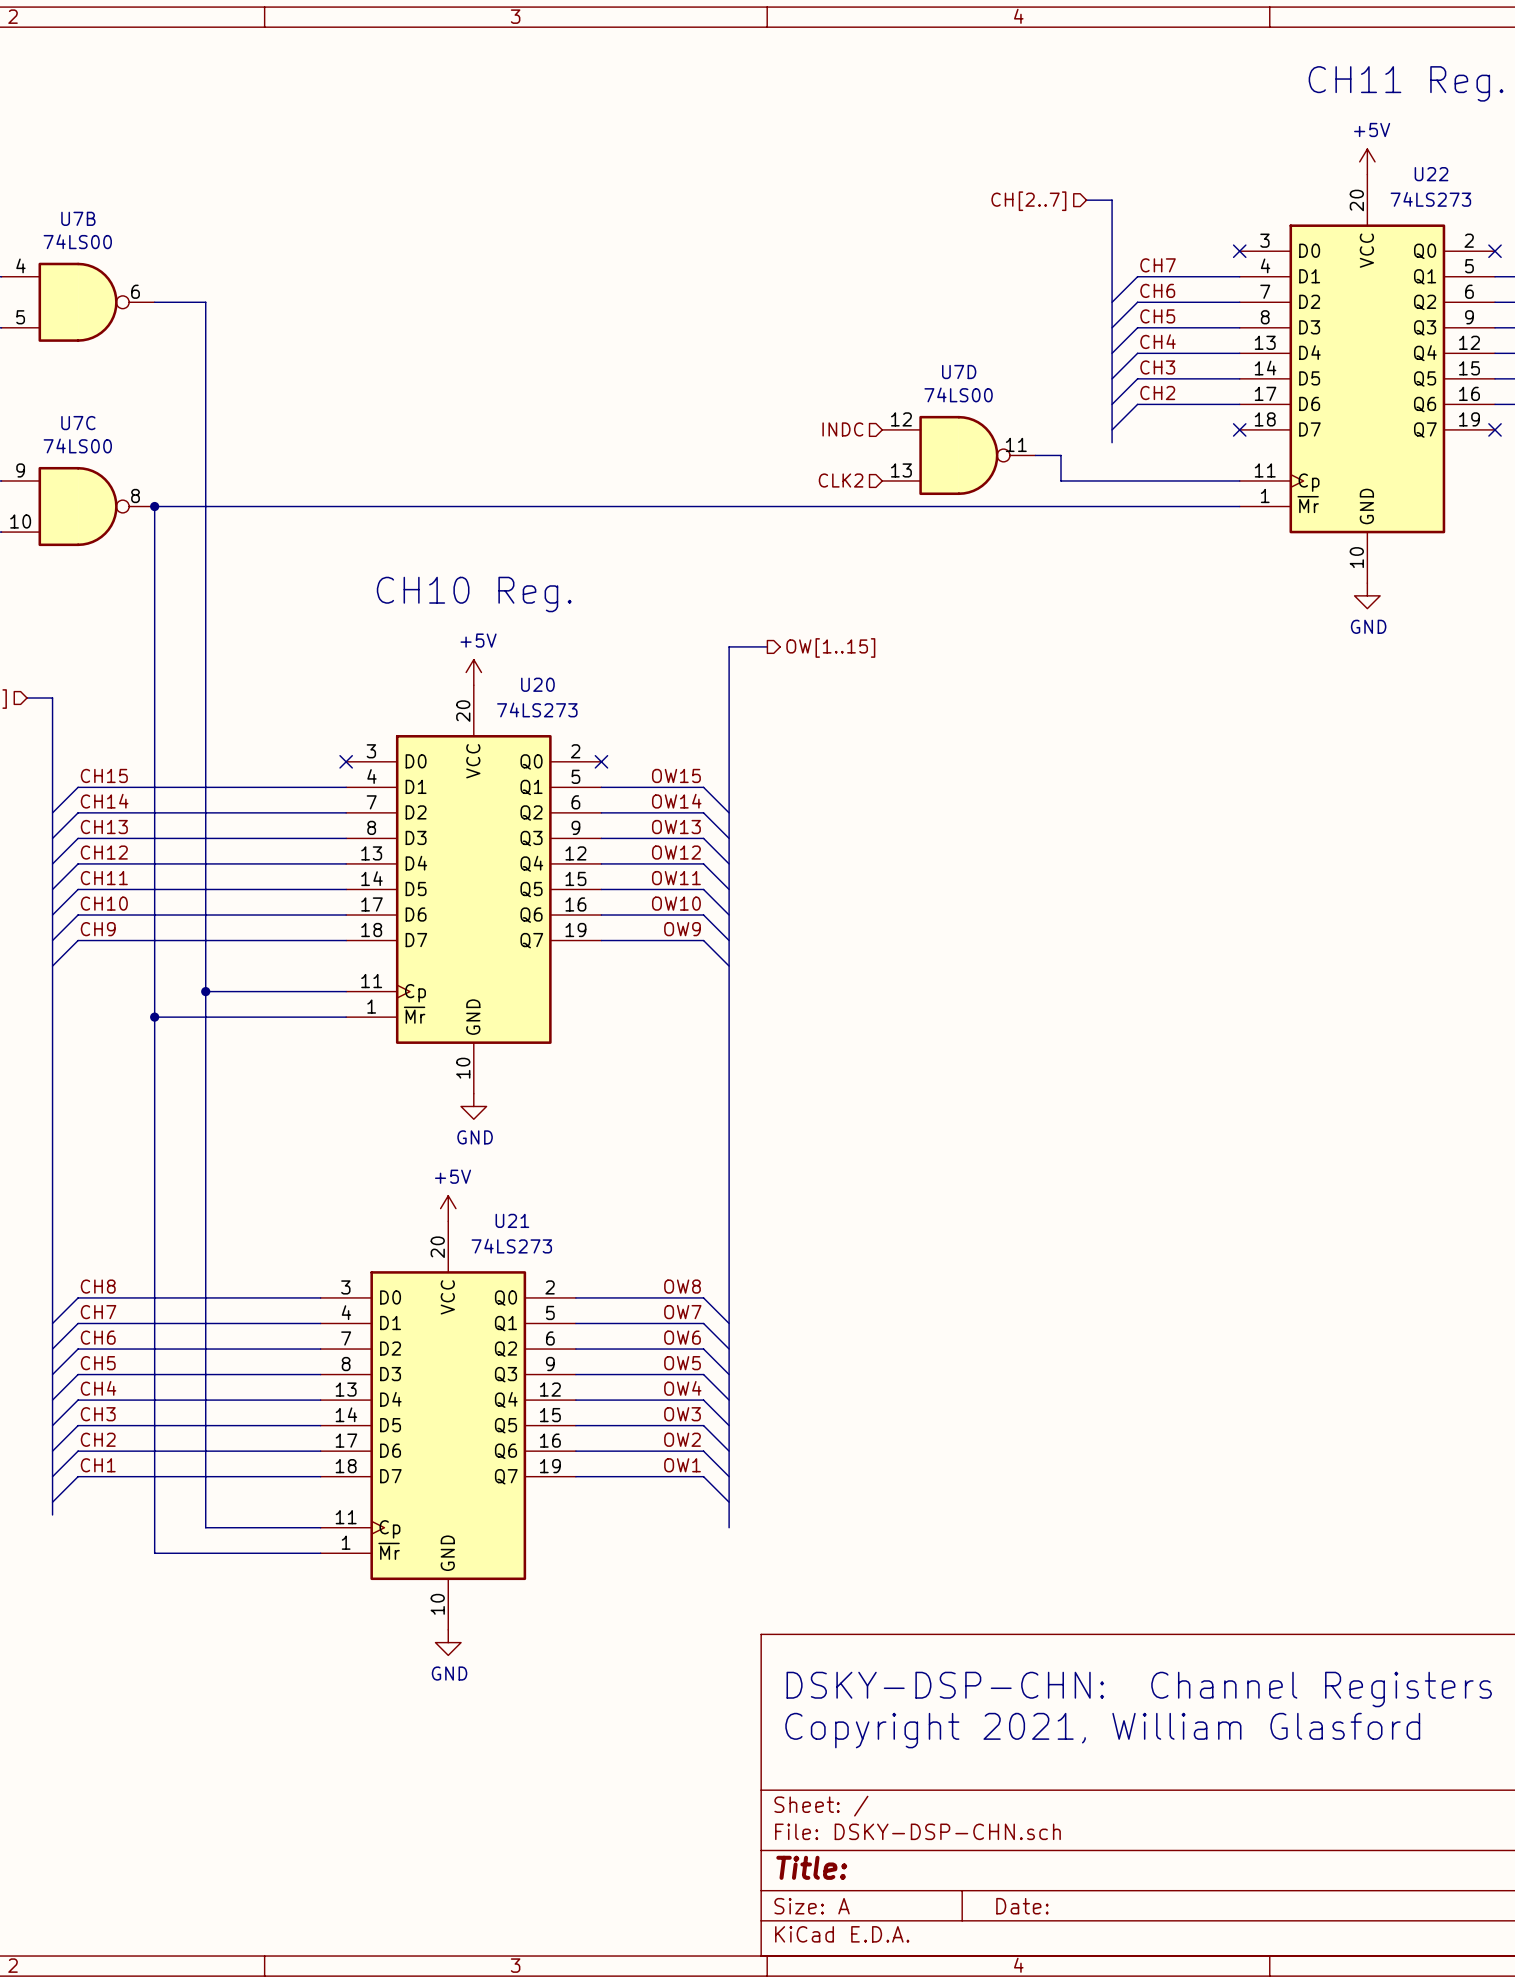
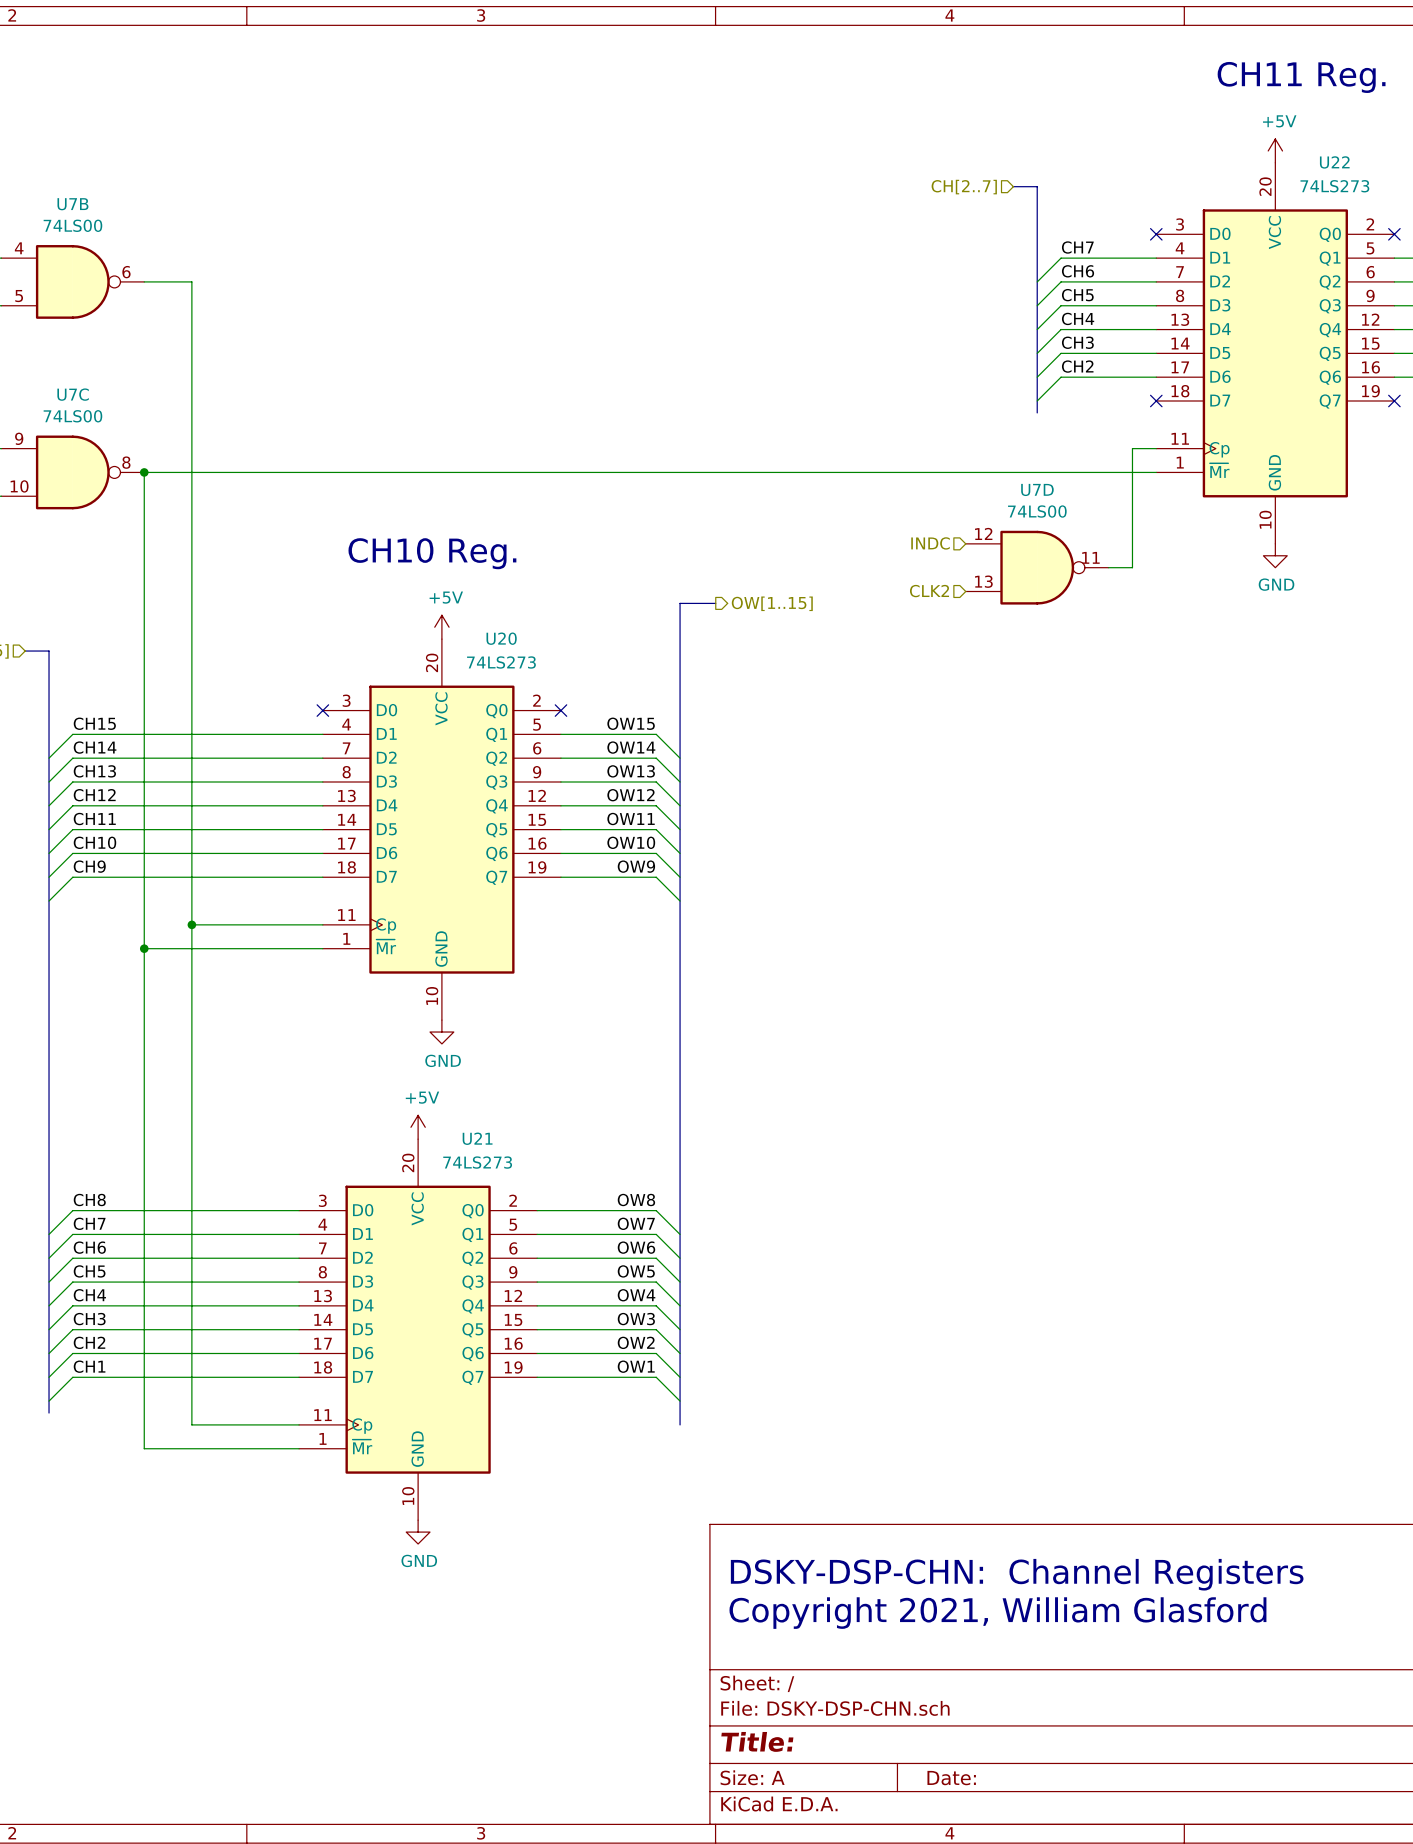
hierarchical label position: INDC (842, 429) -> INDC (930, 543)
U7D position: (958, 455) -> (1037, 567)
wire: (1035, 455) (1061, 455) (1061, 480) (1214, 480) -> (1108, 567) (1132, 567) (1132, 448)
hierarchical label position: CLK2 (841, 480) -> CLK2 (929, 591)

